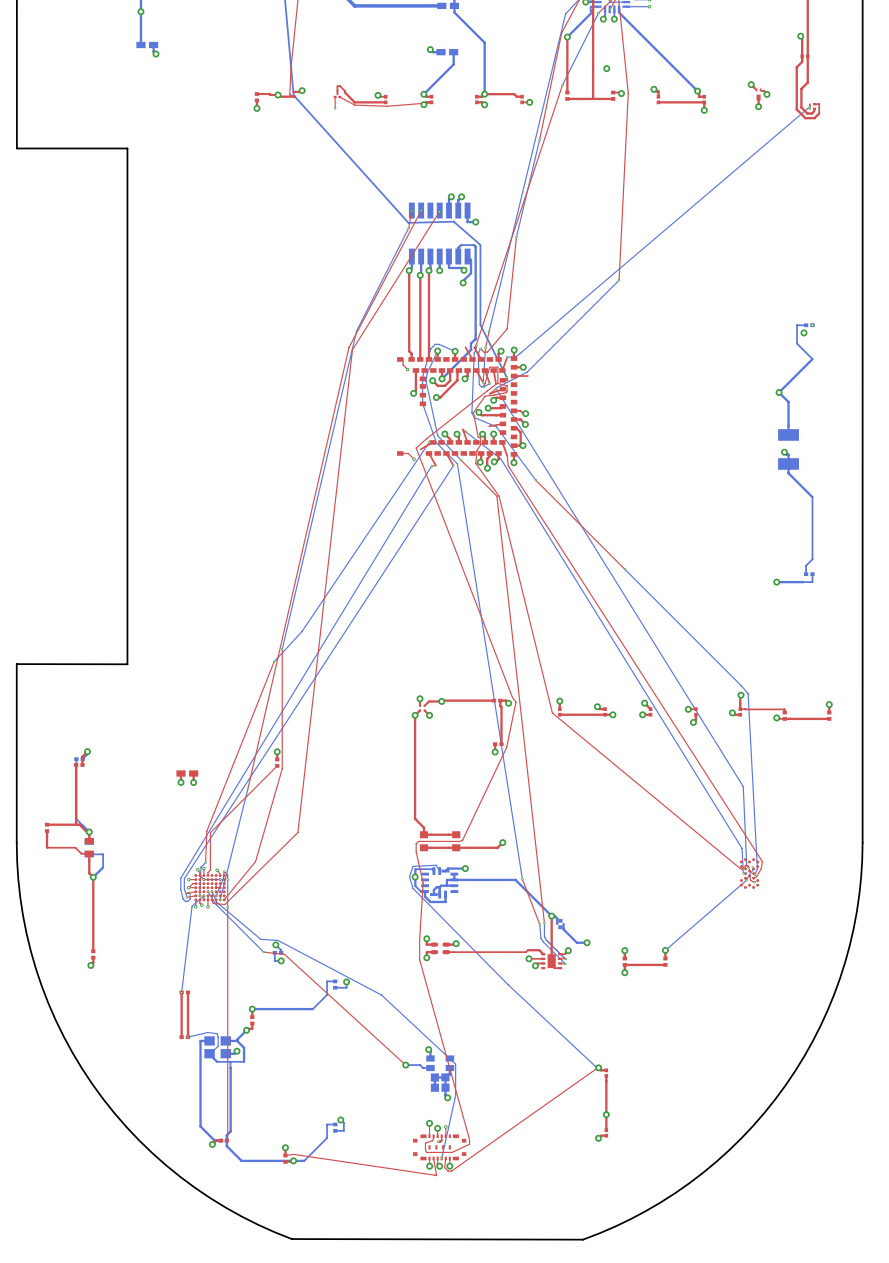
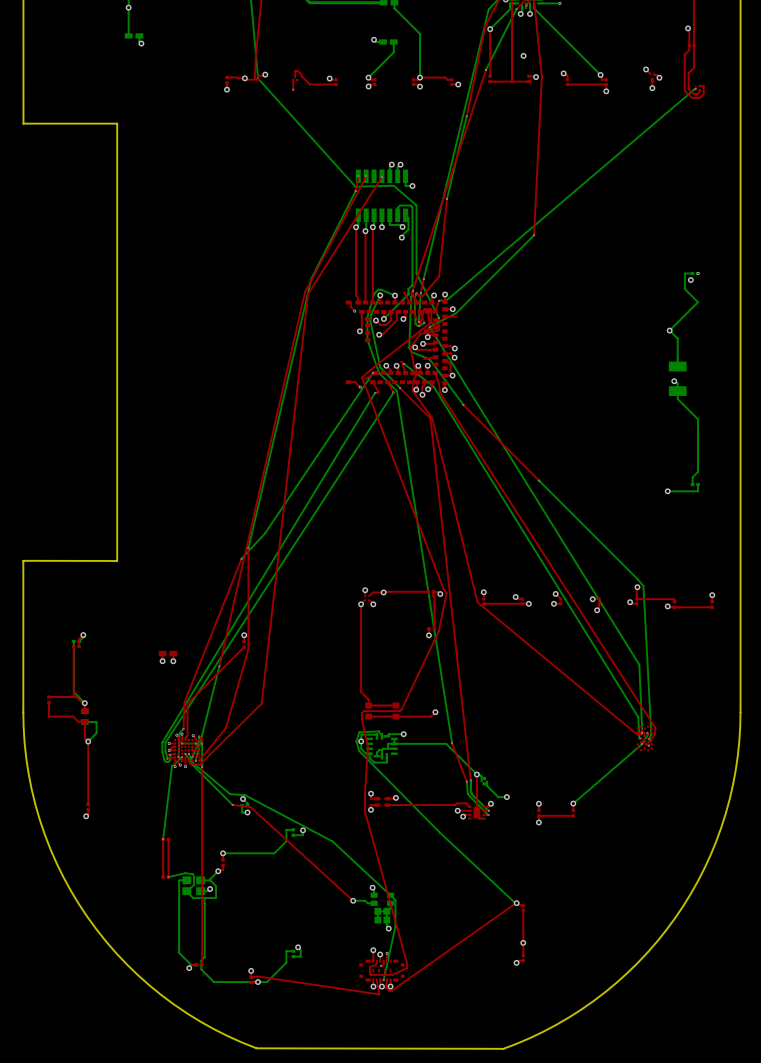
top track: (339, 96) (354, 105) (387, 106) (431, 102) -> none

